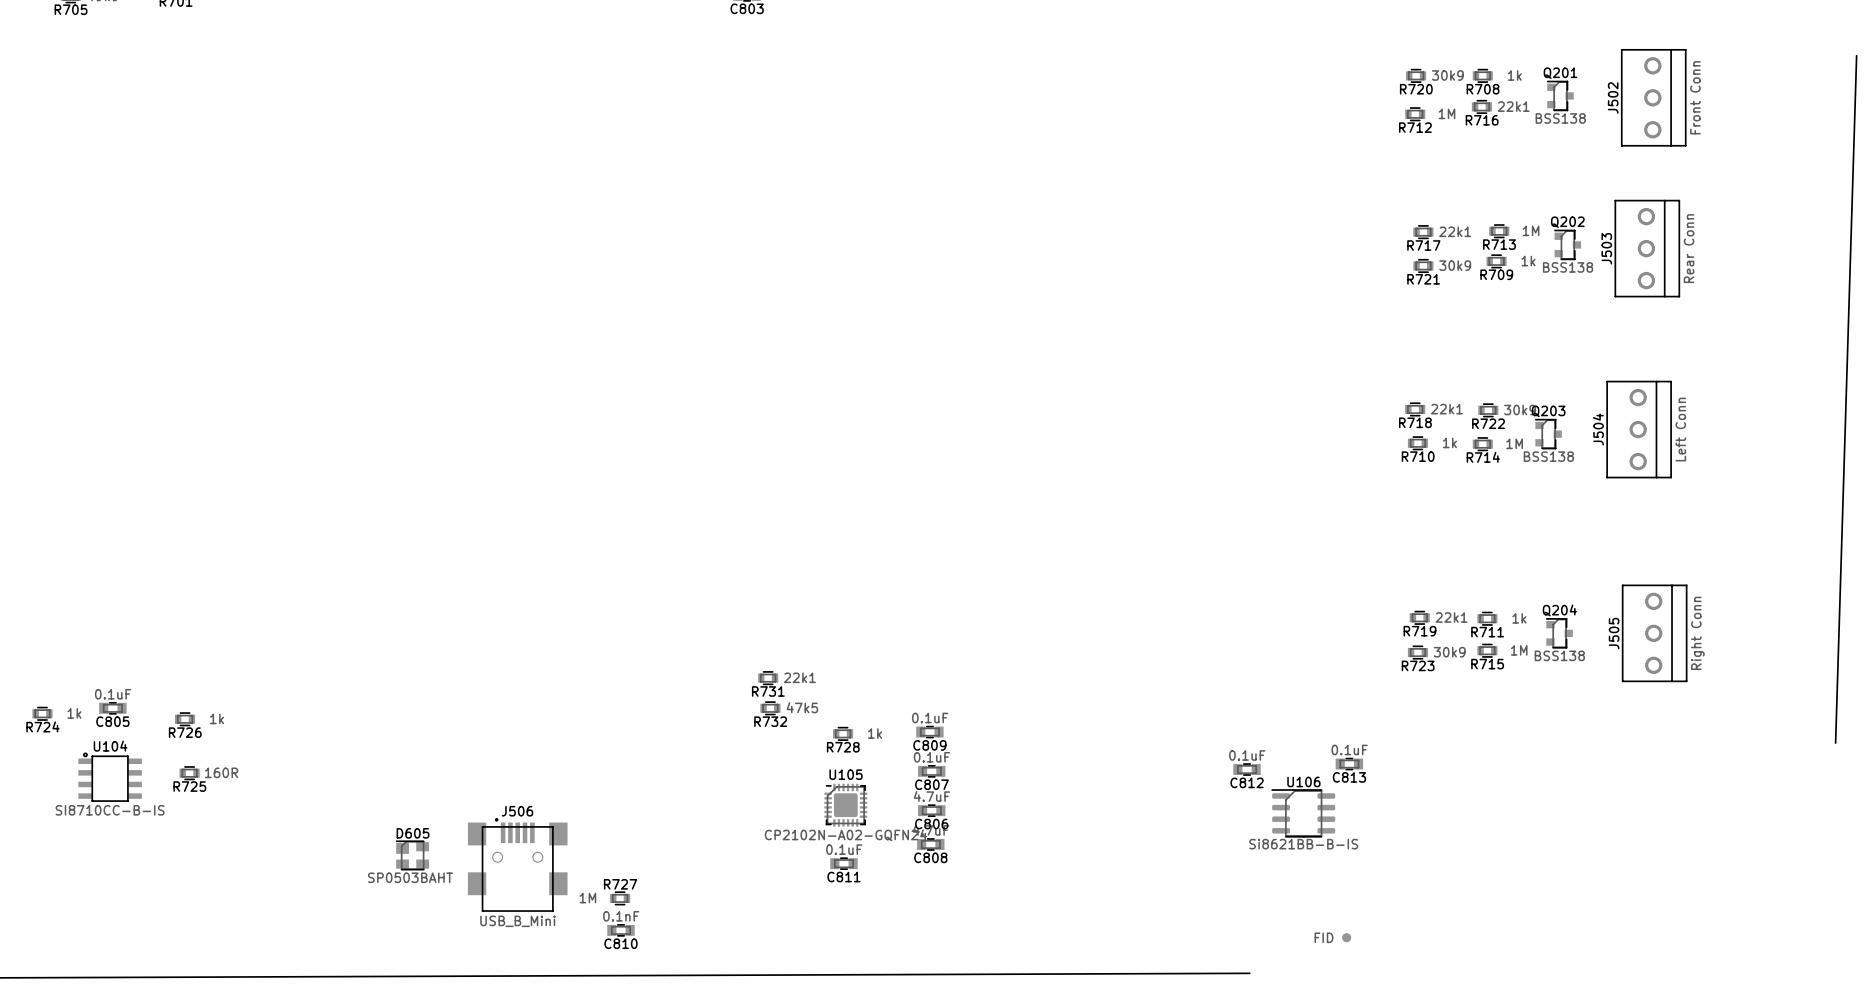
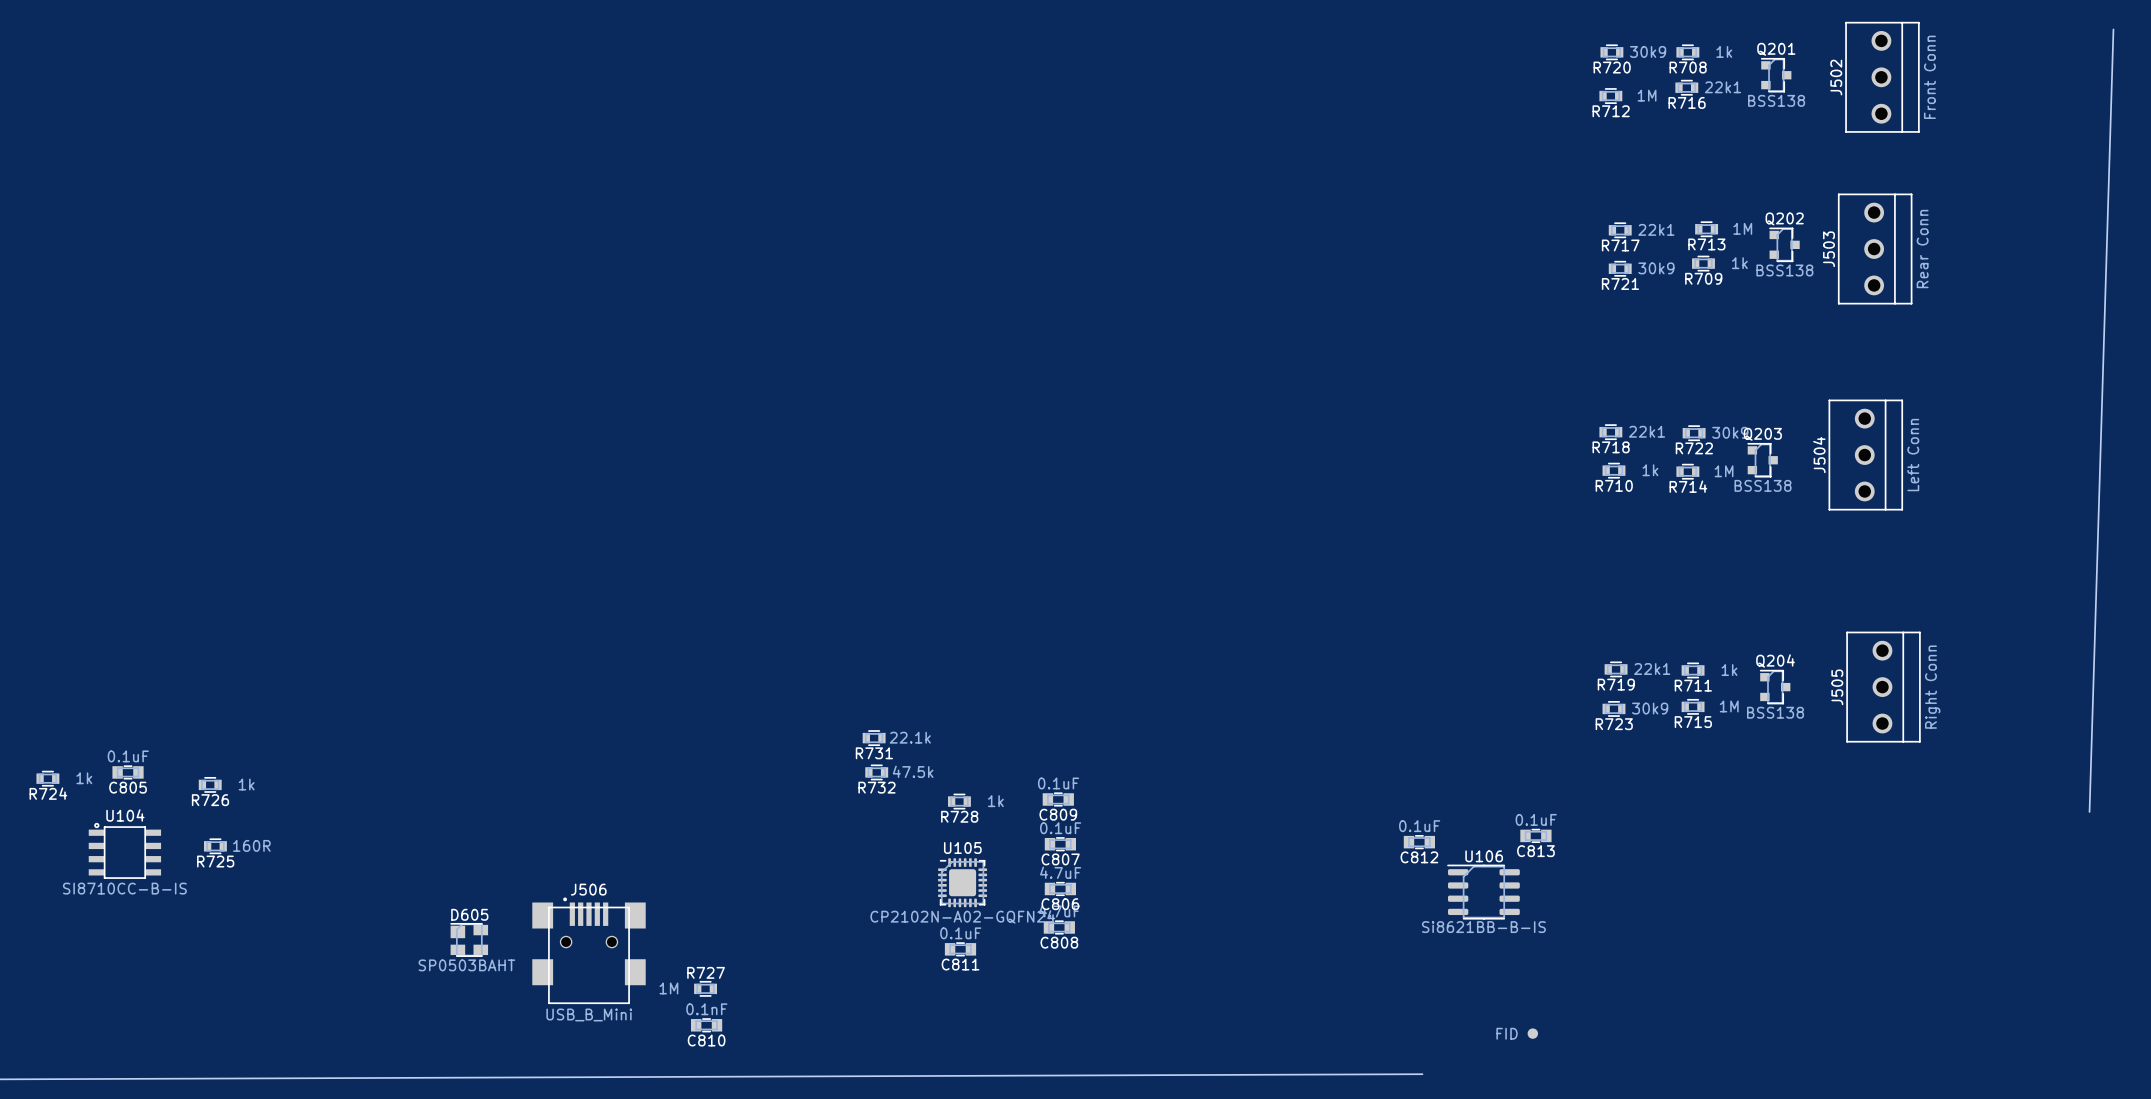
R731 value: 22k1 (799, 677) -> 22.1k (910, 737)
R732 value: 47k5 (802, 707) -> 47.5k (913, 771)

